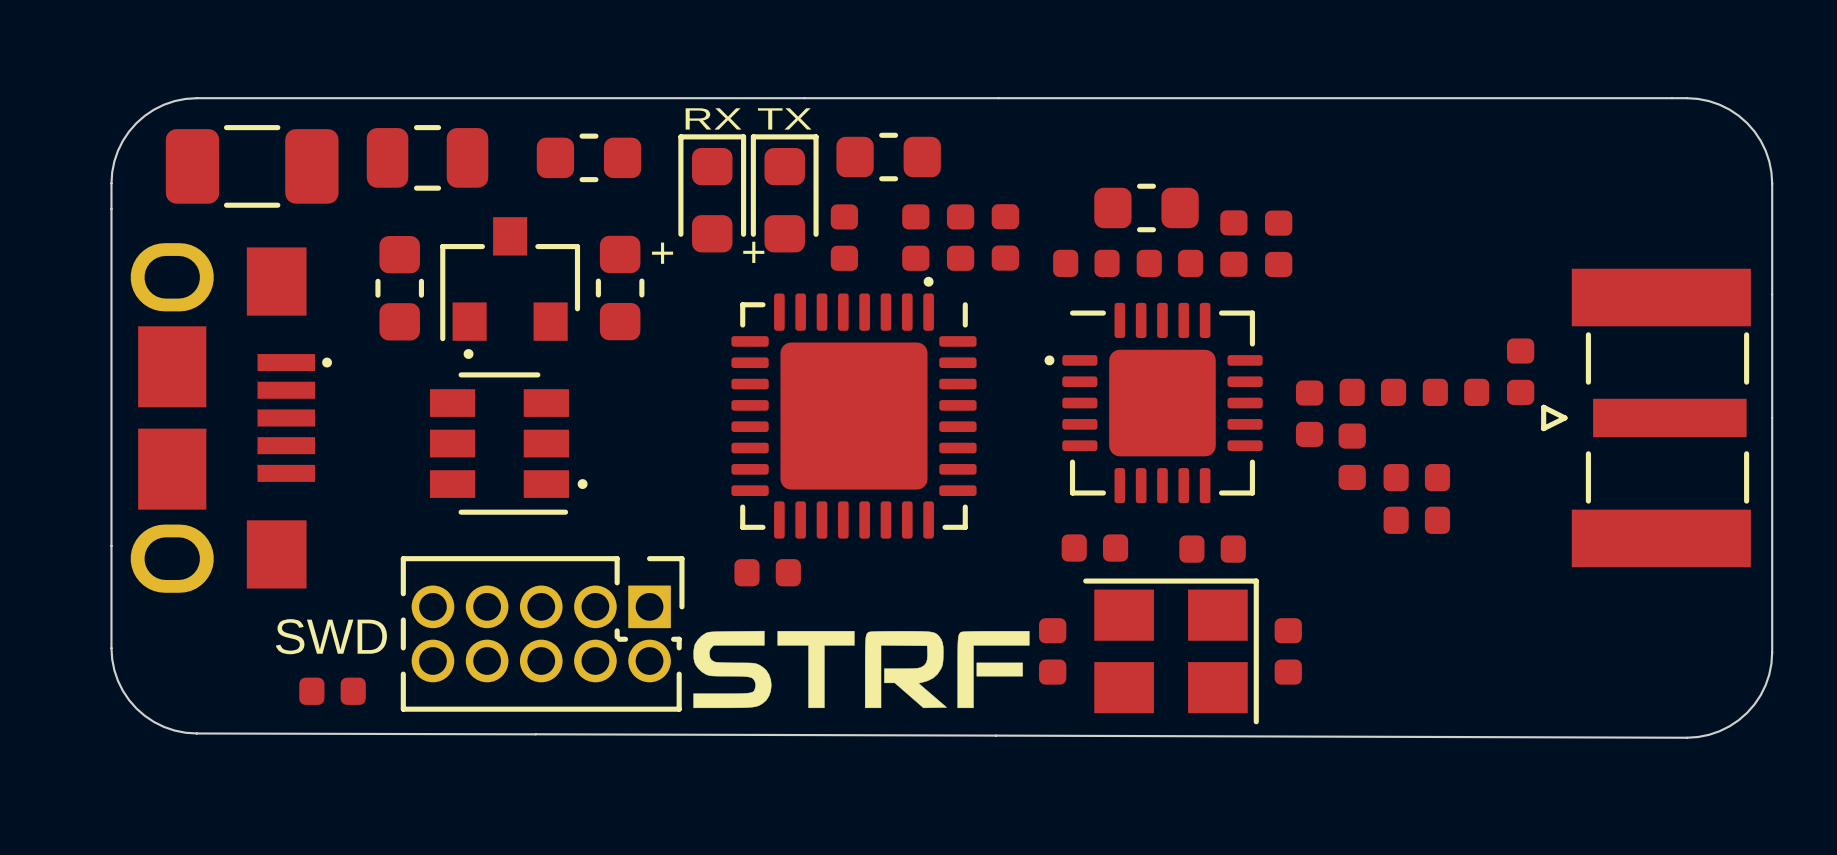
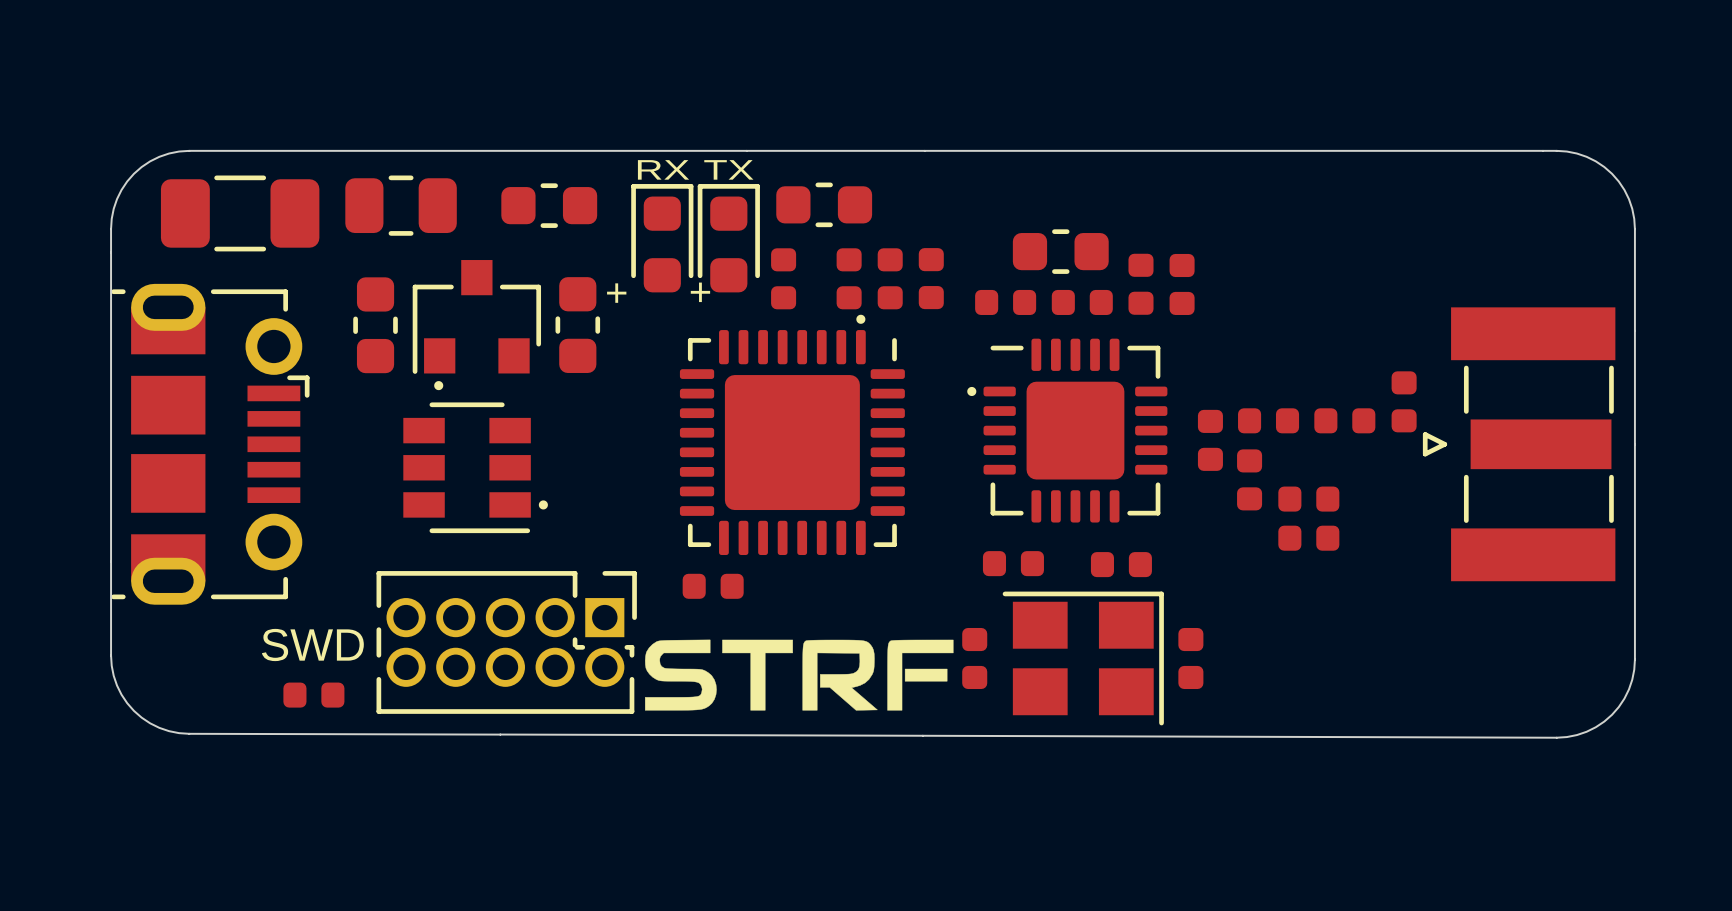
part footprint: [130, 243, 316, 593] -> [111, 283, 310, 605]
part footprint: [1541, 268, 1751, 568] -> [1422, 307, 1616, 582]
drawing: [322, 357, 332, 368] -> none

